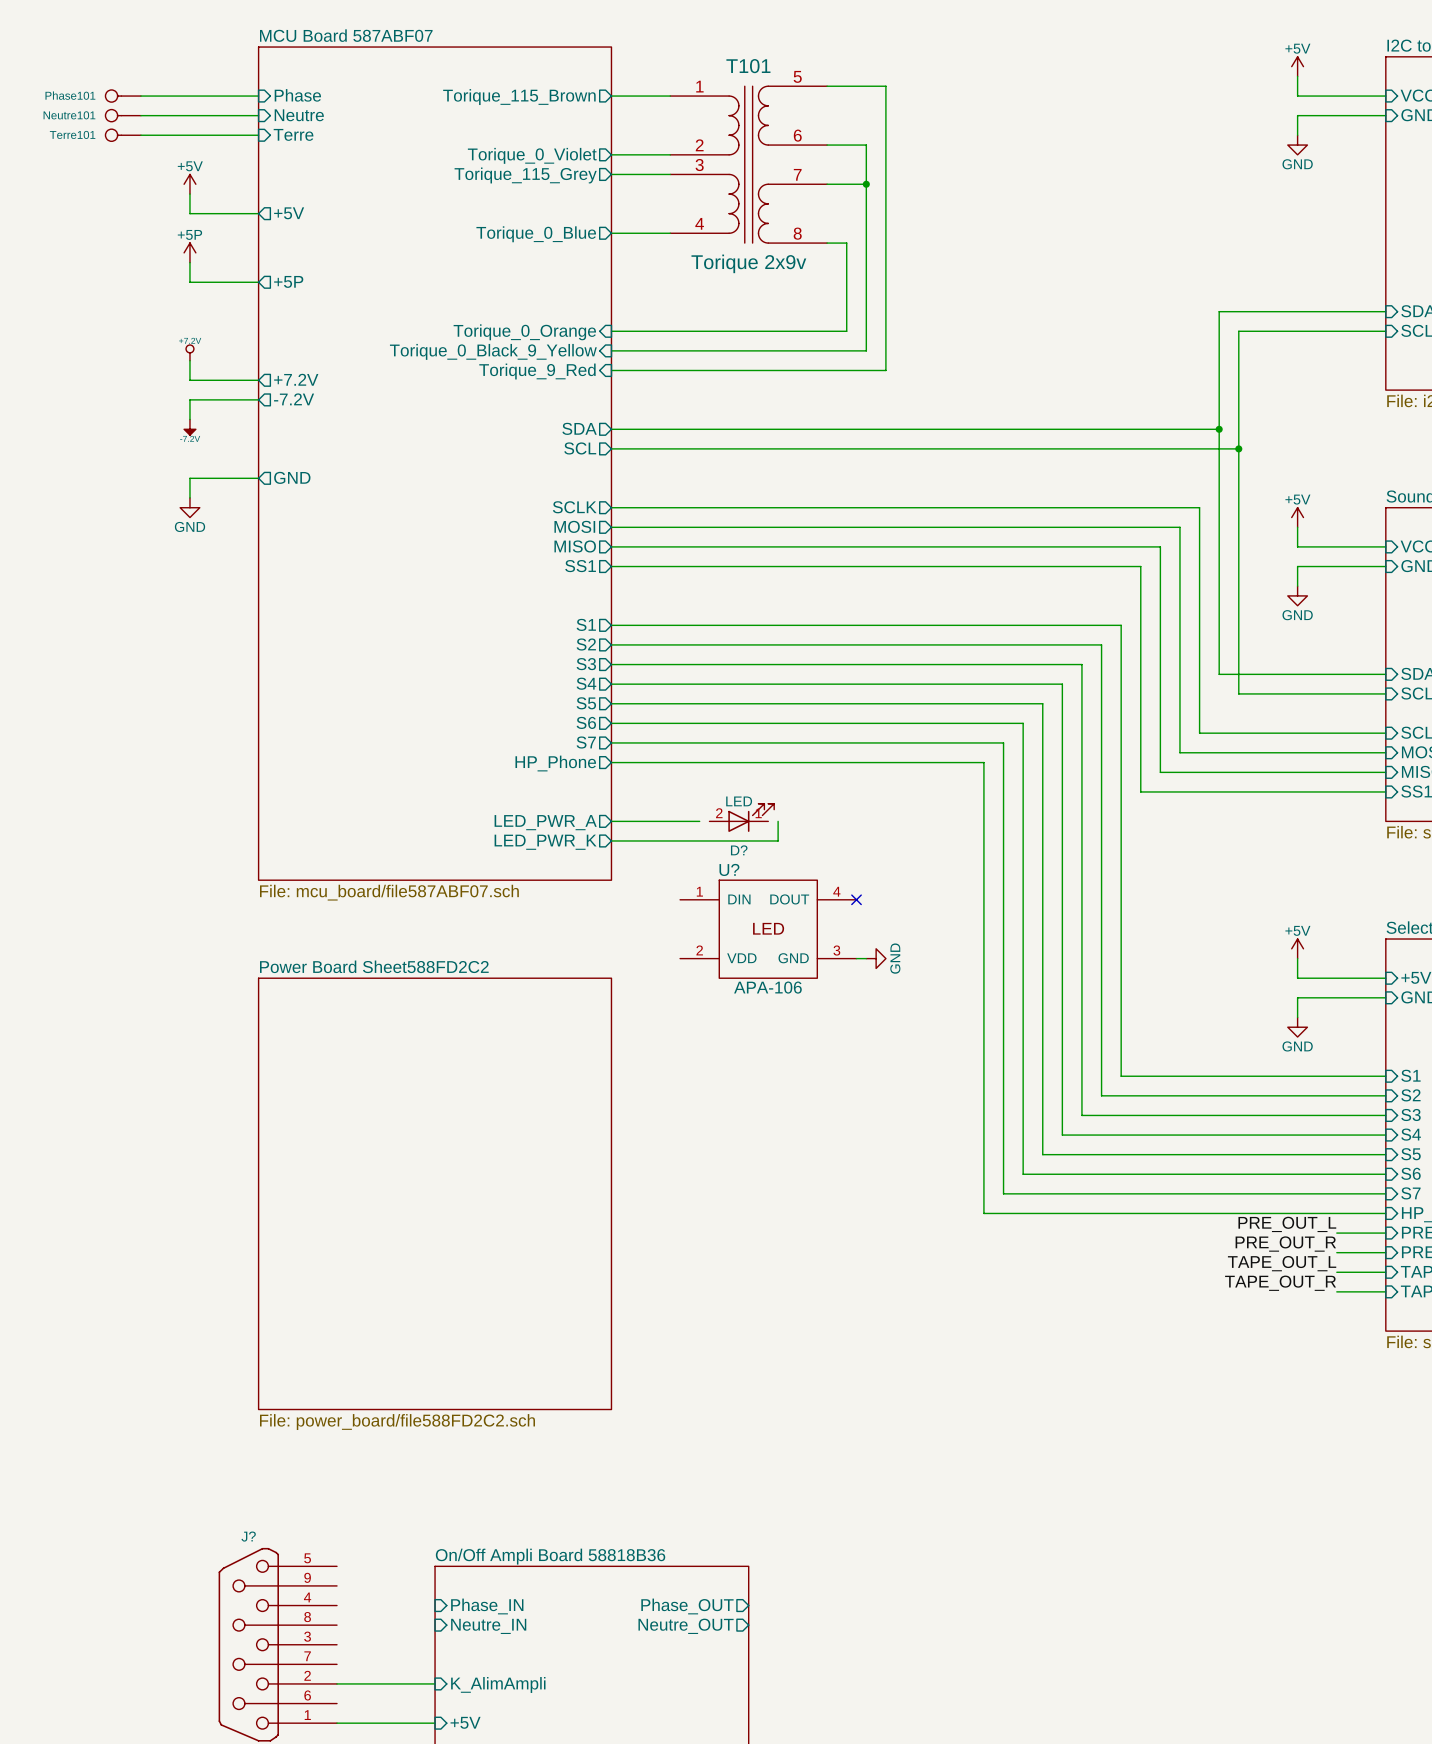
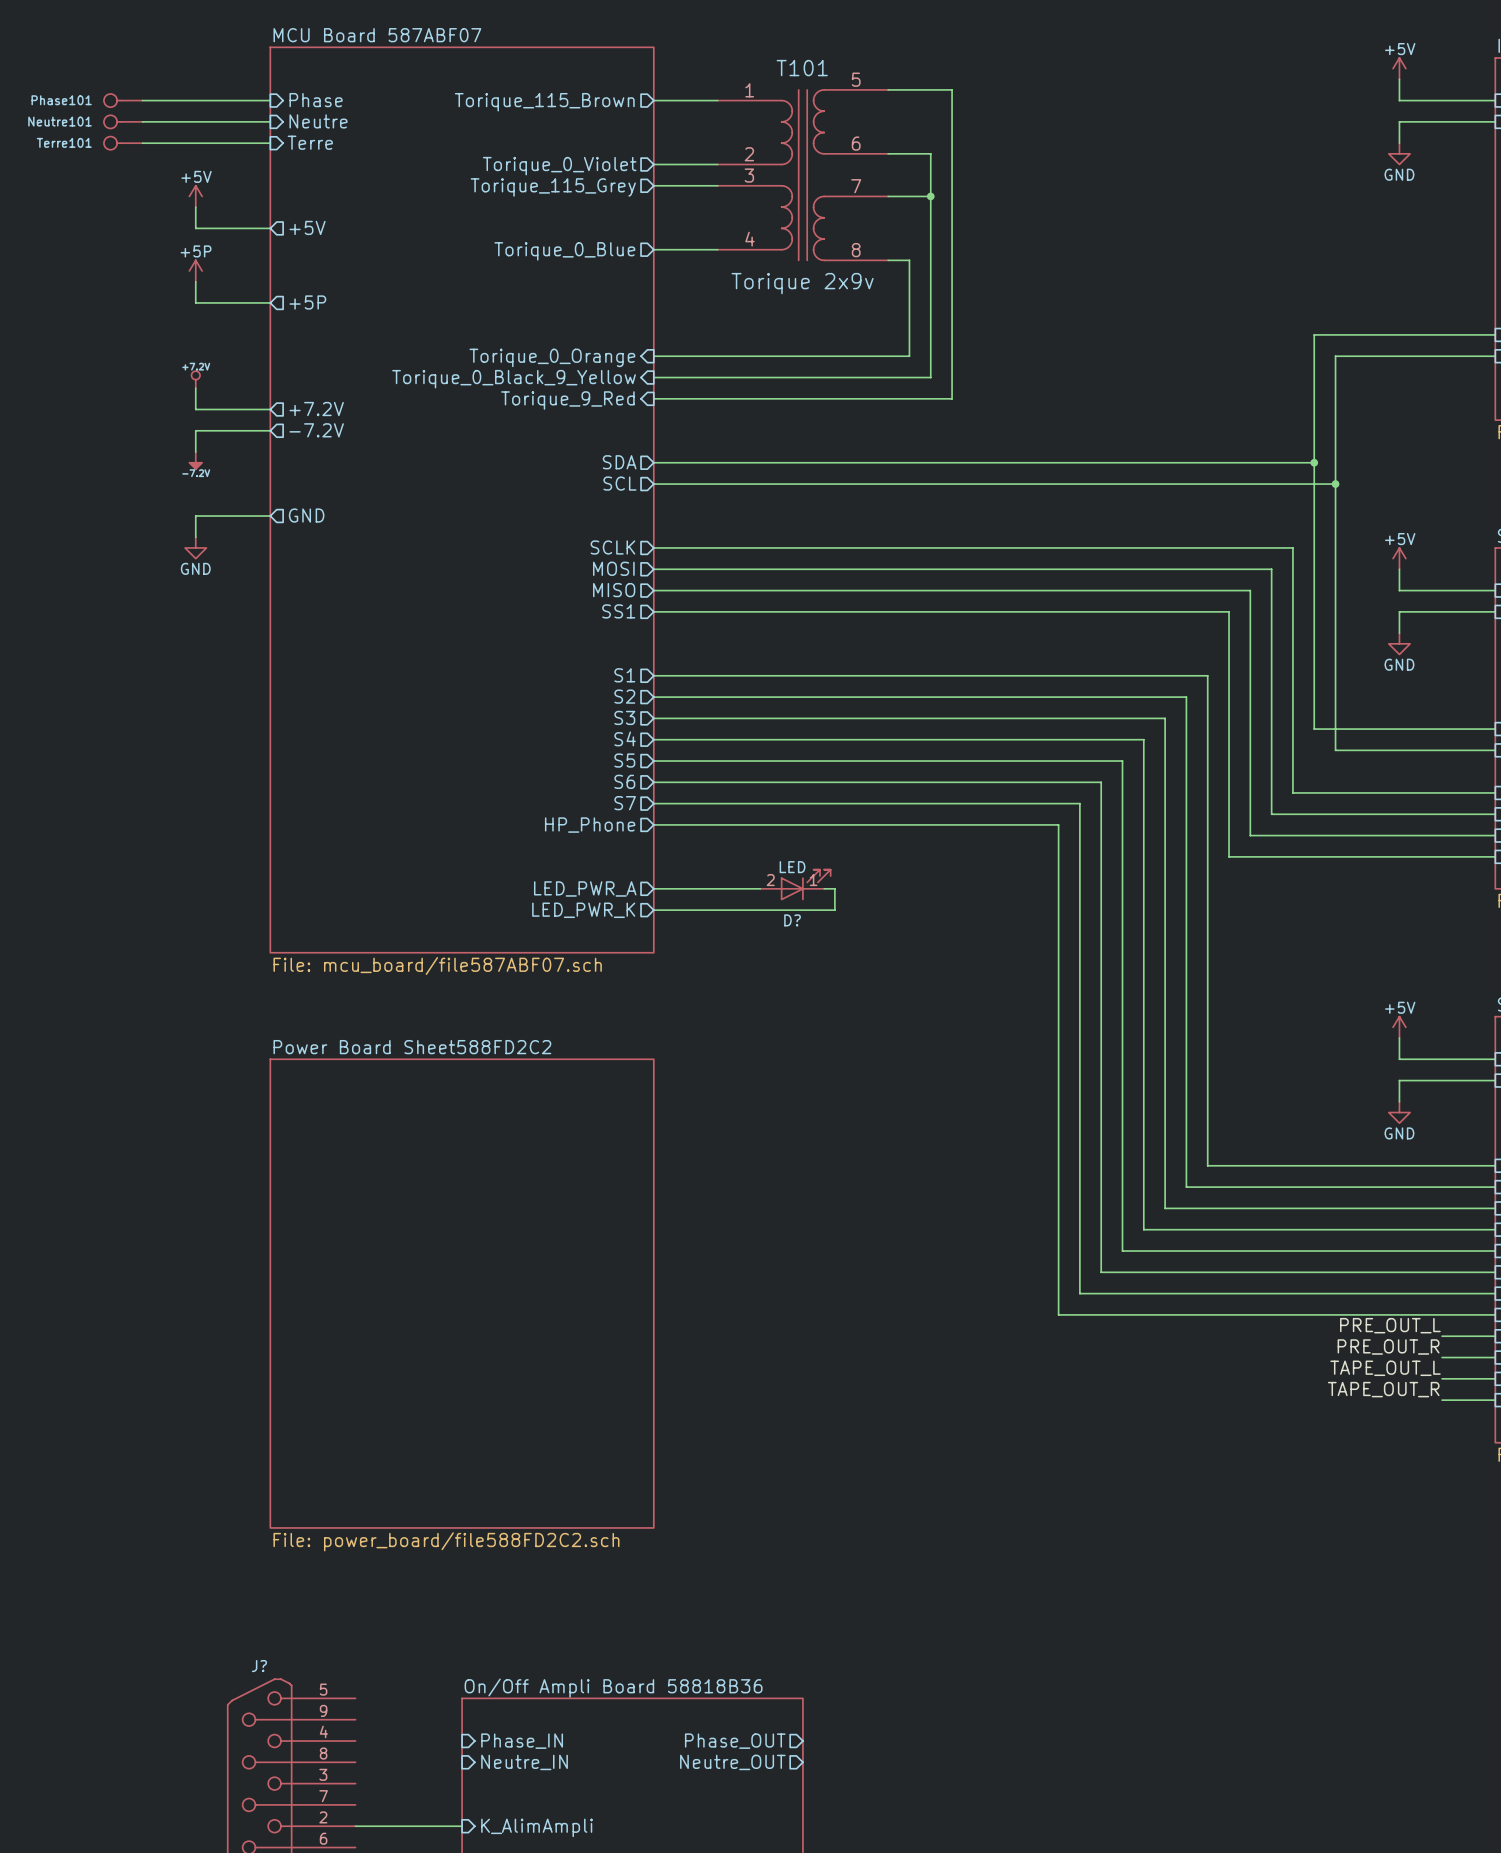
wire: none -> (749, 888) (760, 888)
no-connect mark: (856, 899) -> none
U?: APA-106 (768, 929) -> none
wire: (856, 958) (866, 958) -> (824, 888) (834, 888)
power symbol: GND (876, 958) -> none

